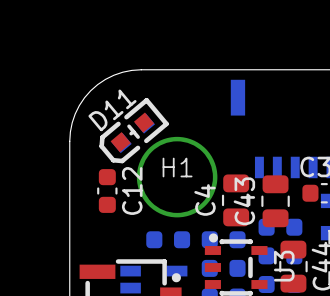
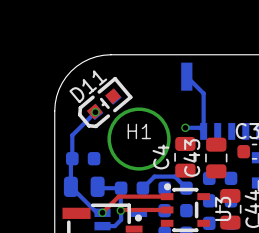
bottom track: none -> (186, 76) (203, 93) (203, 131) (199, 127) (185, 127)
bottom track: none -> (95, 112) (72, 135) (70, 186)
via: none -> (95, 112)
via: none -> (185, 127)
C12 side: top (107, 190) -> bottom (83, 158)
bottom track: none -> (70, 186) (96, 212) (102, 212)
part: none -> (84, 186)
bottom track: none -> (99, 188) (121, 188) (121, 219) (114, 226) (102, 226)
bottom track: none -> (142, 188) (154, 176) (174, 176) (186, 188)
top track: none -> (167, 196) (118, 196) (102, 212)
top track: none -> (167, 209) (120, 210)
via: none -> (120, 210)
via: none -> (102, 212)

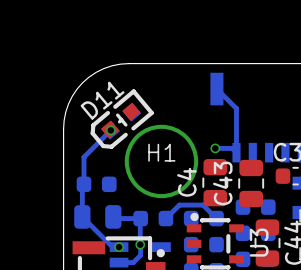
top track: (167, 196) (118, 196) (102, 212) -> none
top track: (121, 209) (167, 209) -> none

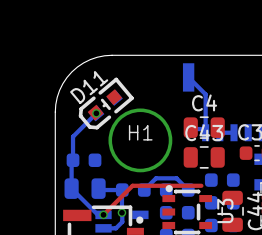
via: (215, 148) -> none
bottom track: none -> (219, 132) (234, 132)
C4 rotation: 0° (215, 182) -> 90° clockwise (204, 127)
C4 position: (215, 182) -> (204, 127)
C43 rotation: 0° (251, 183) -> 90° clockwise (204, 157)
top track: none -> (201, 185) (132, 185) (103, 214)

